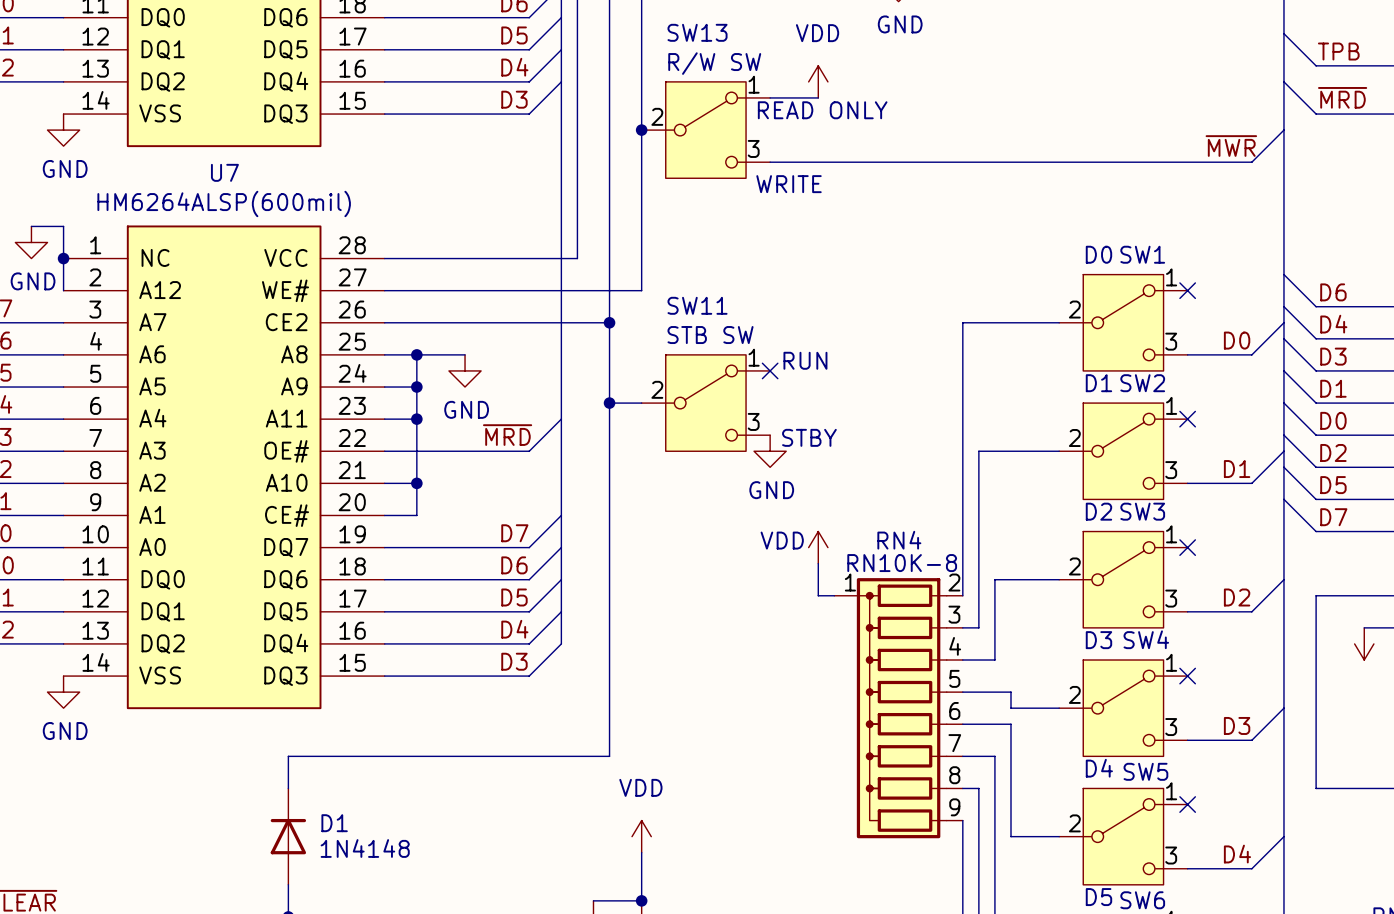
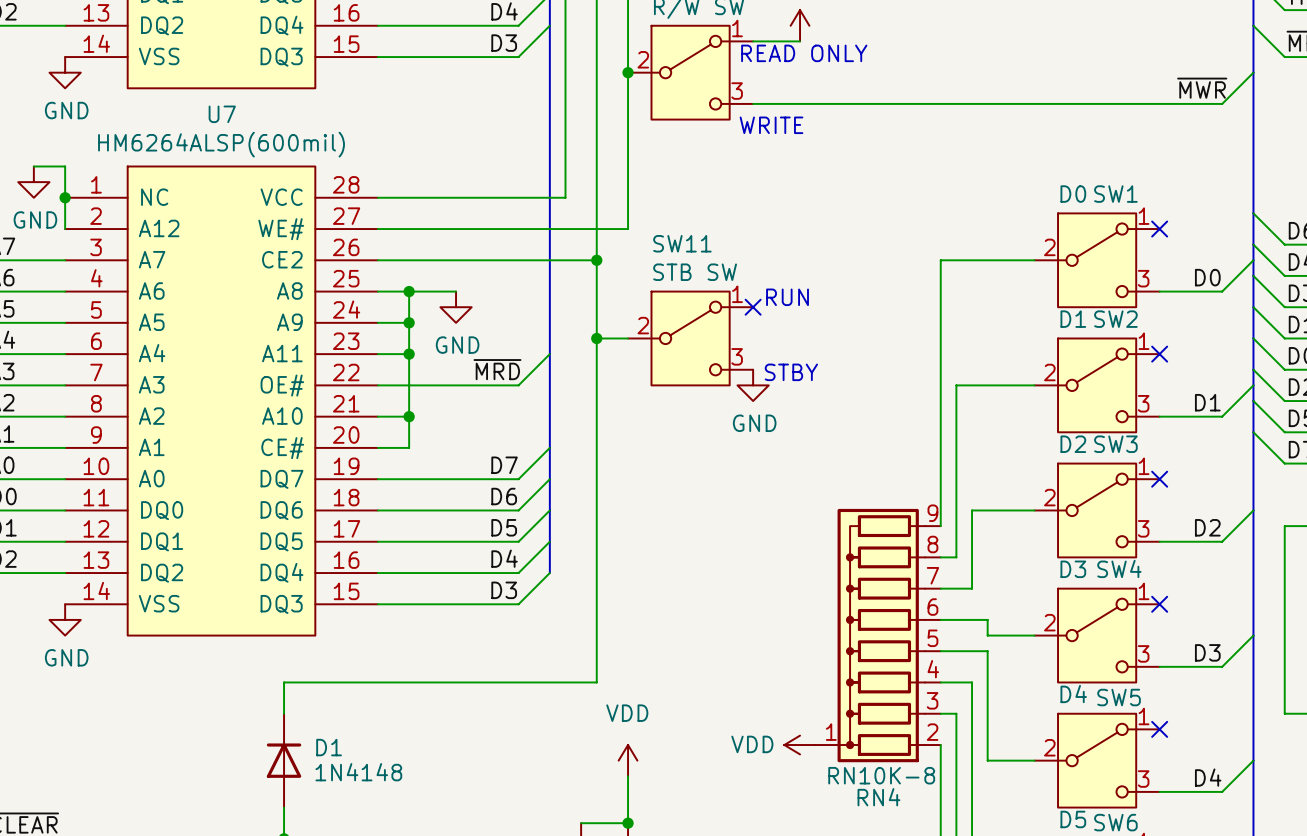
power symbol rotation: 0° (818, 547) -> 90° counterclockwise (800, 745)
power symbol position: VDD (818, 547) -> VDD (800, 745)
wire: (818, 563) (818, 595) (834, 595) -> none
RN4 flip: as is (901, 708) -> up-down (881, 635)

